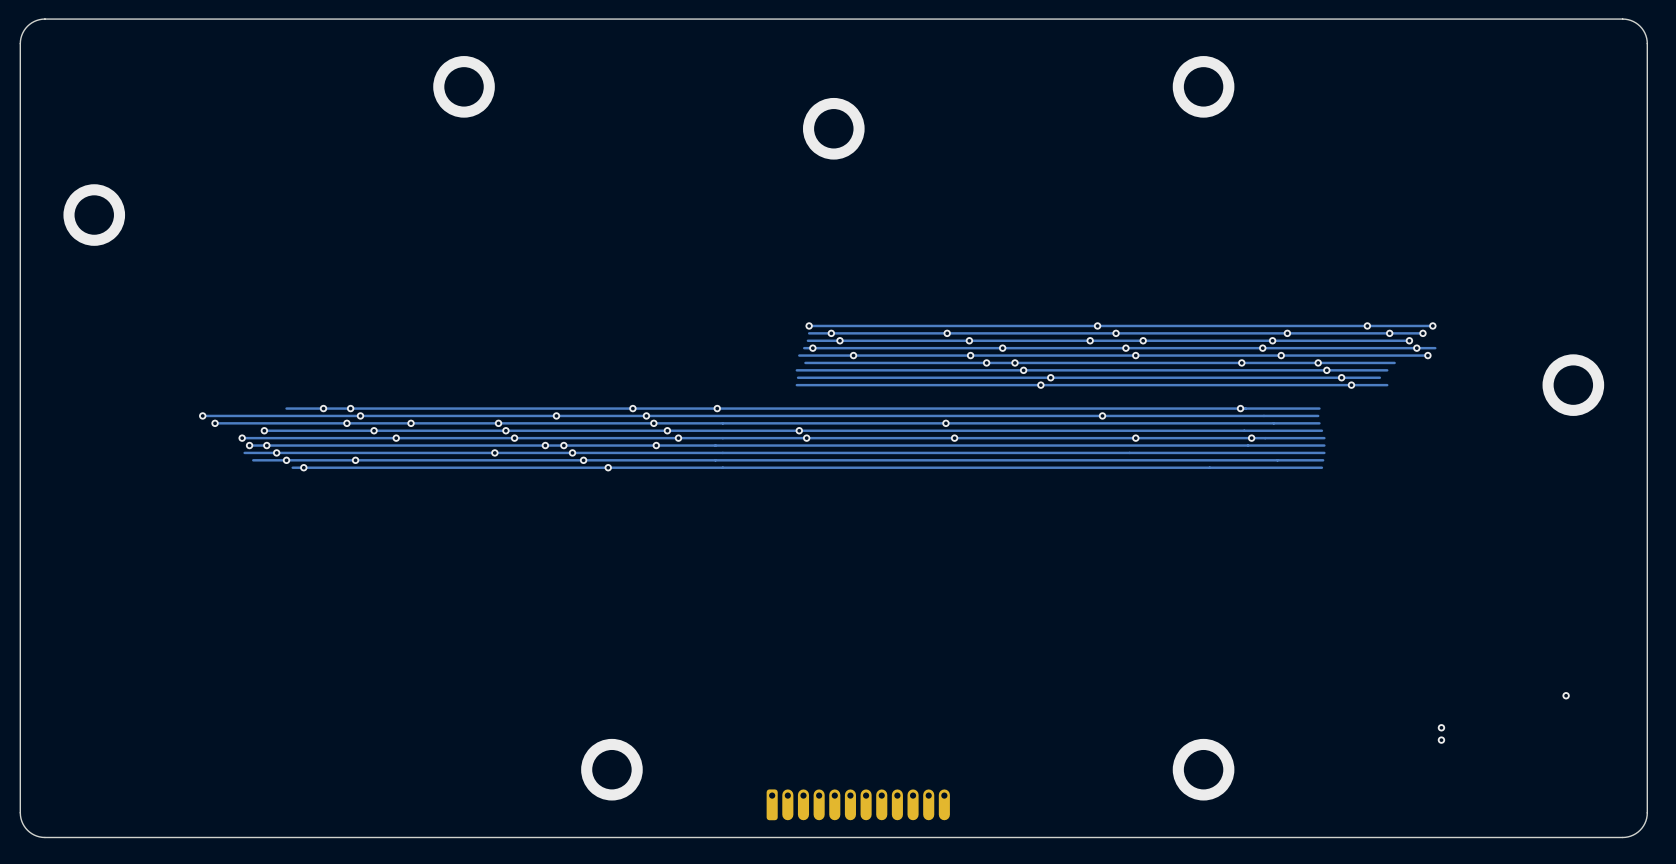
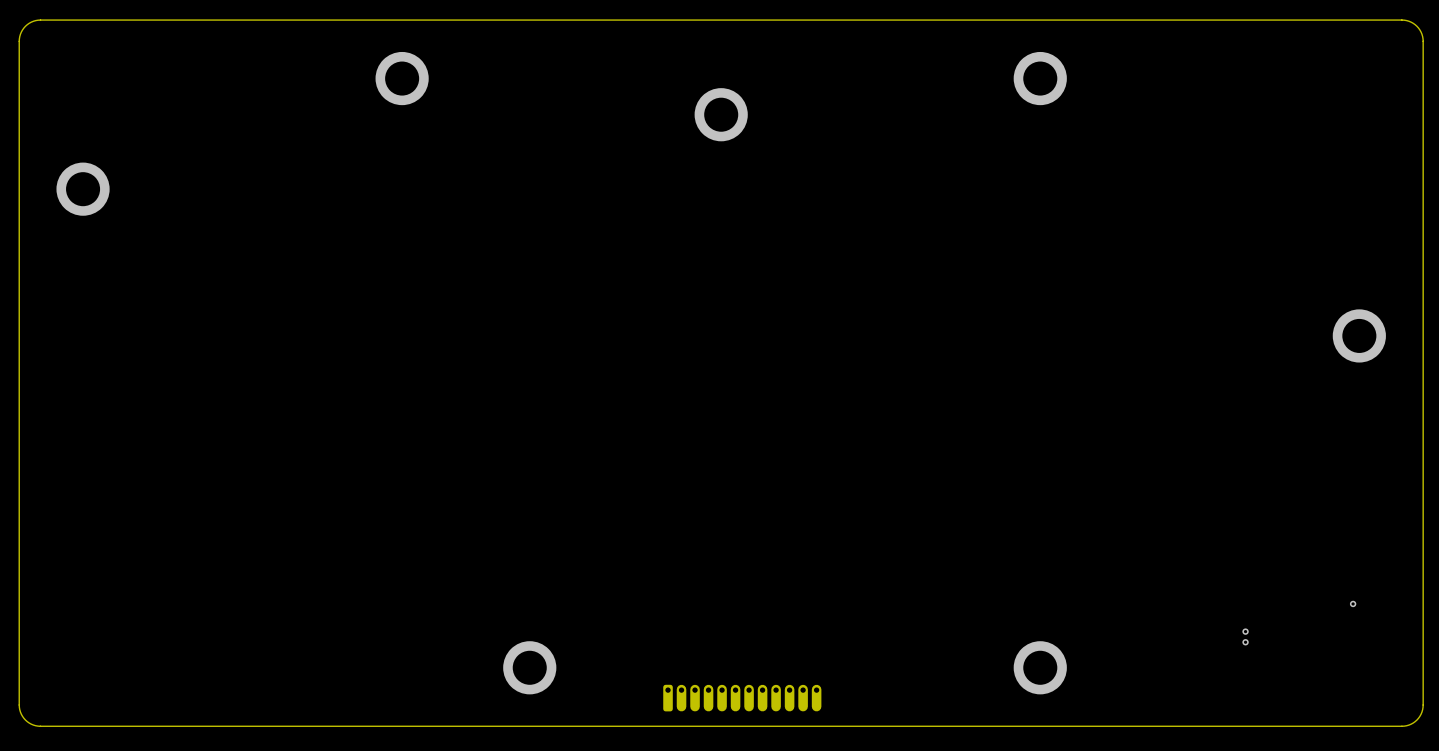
via: (809, 325) -> none
via: (1097, 325) -> none
via: (1367, 325) -> none
track: (1432, 325) (807, 325) -> none
via: (1432, 325) -> none
via: (831, 333) -> none
via: (947, 333) -> none
via: (1116, 333) -> none
via: (1287, 333) -> none
via: (1389, 333) -> none
track: (1422, 333) (809, 333) -> none
via: (1422, 333) -> none
via: (839, 340) -> none
via: (969, 340) -> none
via: (1090, 340) -> none
via: (1143, 340) -> none
via: (1272, 340) -> none
track: (1409, 340) (807, 340) -> none
via: (1409, 340) -> none
via: (812, 348) -> none
via: (1002, 348) -> none
via: (1125, 348) -> none
via: (1262, 348) -> none
via: (1416, 348) -> none
track: (1435, 348) (804, 348) -> none
via: (853, 355) -> none
via: (970, 355) -> none
via: (1135, 355) -> none
via: (1281, 355) -> none
track: (1427, 355) (799, 355) -> none
via: (1427, 355) -> none
via: (986, 362) -> none
via: (1014, 362) -> none
via: (1241, 362) -> none
via: (1318, 362) -> none
track: (1394, 362) (805, 362) -> none
via: (1023, 370) -> none
via: (1326, 370) -> none
track: (1387, 370) (796, 370) -> none
via: (1050, 377) -> none
via: (1341, 377) -> none
track: (1379, 377) (798, 377) -> none
via: (1040, 385) -> none
via: (1351, 385) -> none
track: (1387, 385) (796, 385) -> none
via: (323, 408) -> none
via: (350, 408) -> none
via: (632, 408) -> none
via: (717, 408) -> none
via: (1240, 408) -> none
track: (1319, 408) (286, 408) -> none
via: (202, 415) -> none
via: (360, 415) -> none
via: (556, 415) -> none
via: (646, 415) -> none
via: (1102, 415) -> none
track: (1318, 415) (202, 415) -> none
via: (215, 423) -> none
via: (346, 423) -> none
via: (411, 423) -> none
via: (498, 423) -> none
via: (653, 423) -> none
via: (945, 423) -> none
track: (1319, 423) (215, 423) -> none
via: (264, 430) -> none
via: (374, 430) -> none
via: (505, 430) -> none
via: (667, 430) -> none
via: (799, 430) -> none
track: (1321, 430) (264, 430) -> none
via: (242, 438) -> none
via: (396, 438) -> none
via: (514, 438) -> none
via: (678, 438) -> none
via: (806, 438) -> none
via: (954, 438) -> none
via: (1135, 438) -> none
via: (1251, 438) -> none
track: (1324, 438) (242, 438) -> none
via: (249, 445) -> none
via: (266, 445) -> none
via: (545, 445) -> none
via: (563, 445) -> none
via: (656, 445) -> none
track: (1324, 445) (249, 445) -> none
via: (276, 452) -> none
via: (494, 452) -> none
via: (572, 452) -> none
track: (1324, 452) (244, 452) -> none
via: (286, 460) -> none
via: (355, 460) -> none
via: (583, 460) -> none
track: (1323, 460) (253, 460) -> none
via: (303, 467) -> none
via: (608, 467) -> none
track: (1321, 467) (292, 467) -> none

